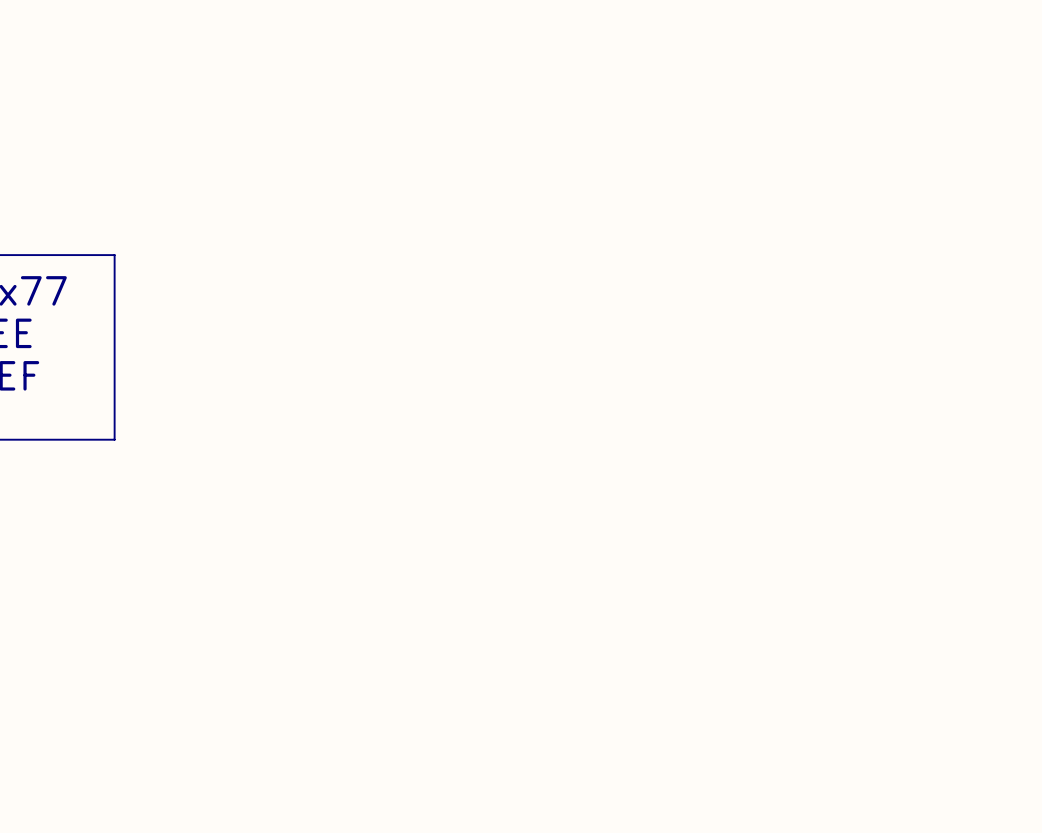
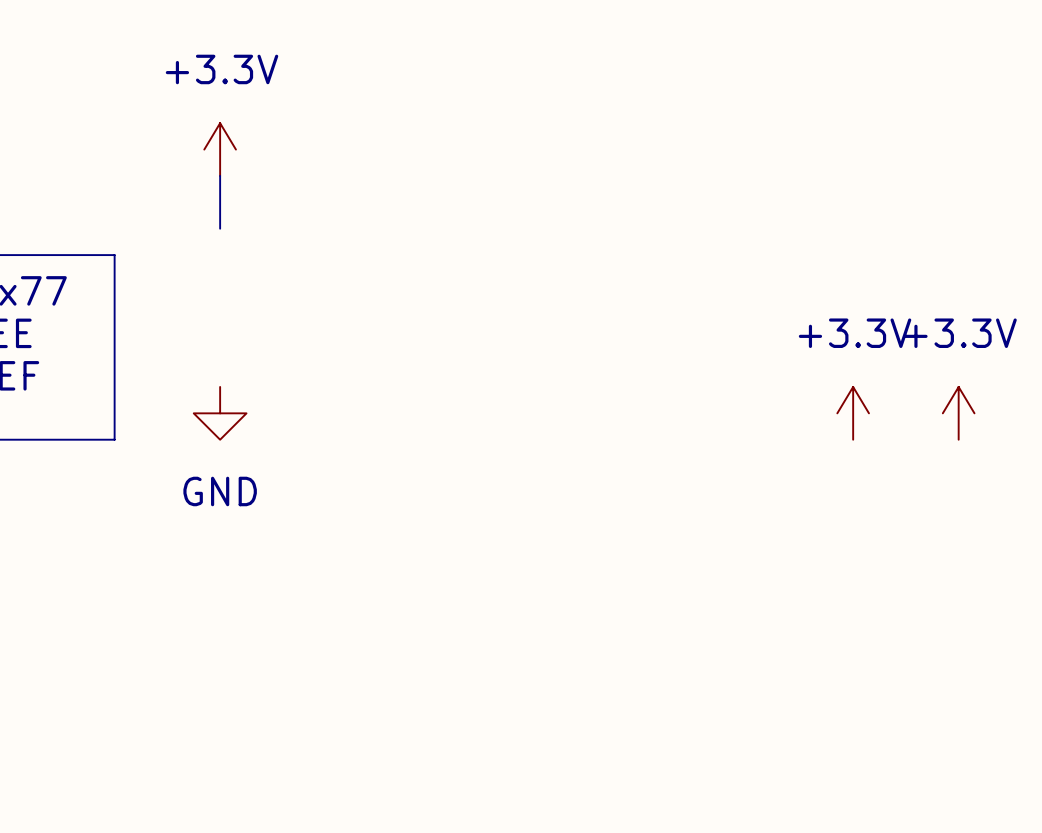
power symbol: none -> +3.3V (220, 149)
wire: none -> (220, 175) (220, 228)
power symbol: none -> GND (220, 413)
power symbol: none -> +3.3V (853, 413)
power symbol: none -> +3.3V (958, 413)

